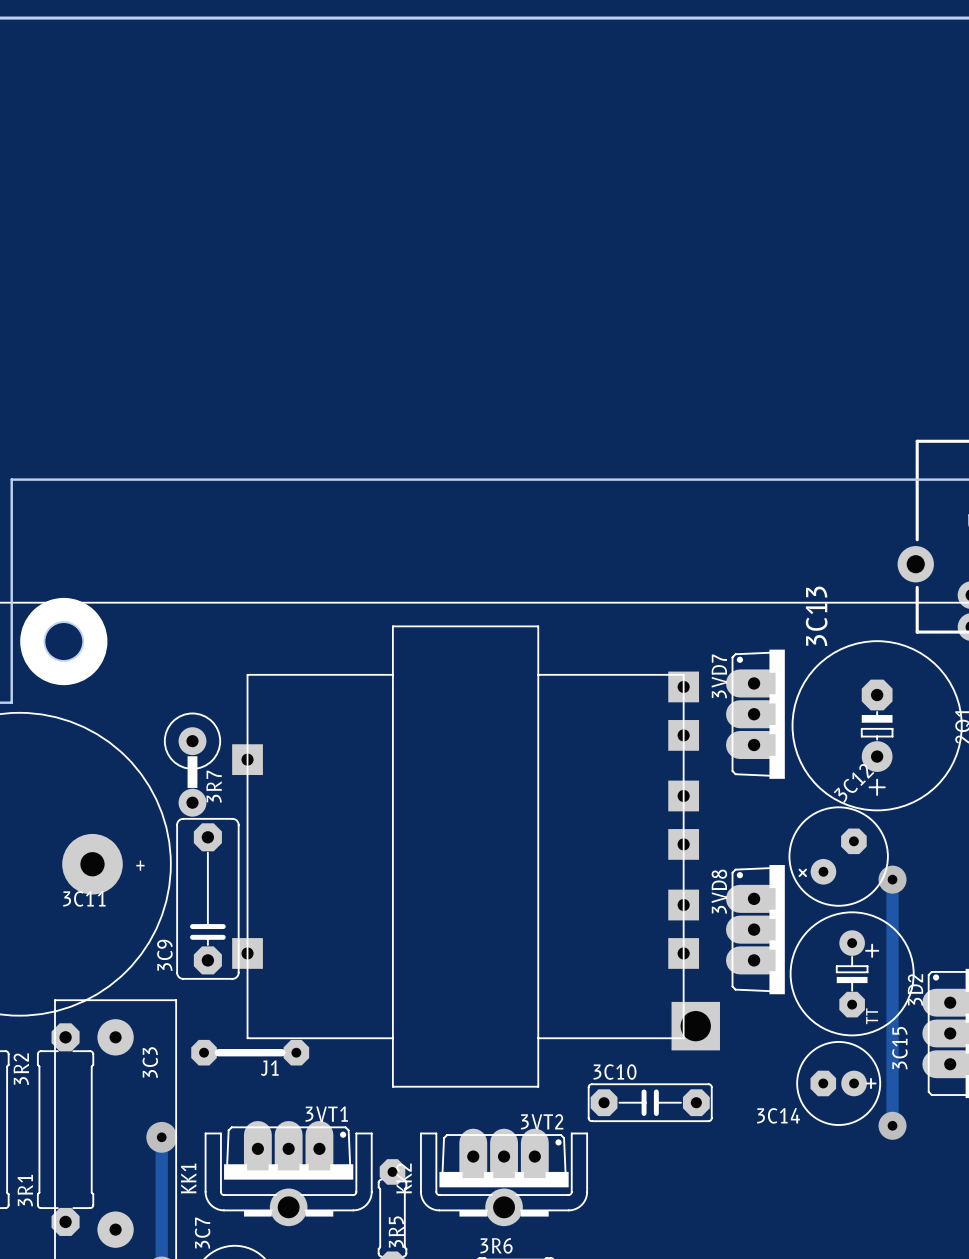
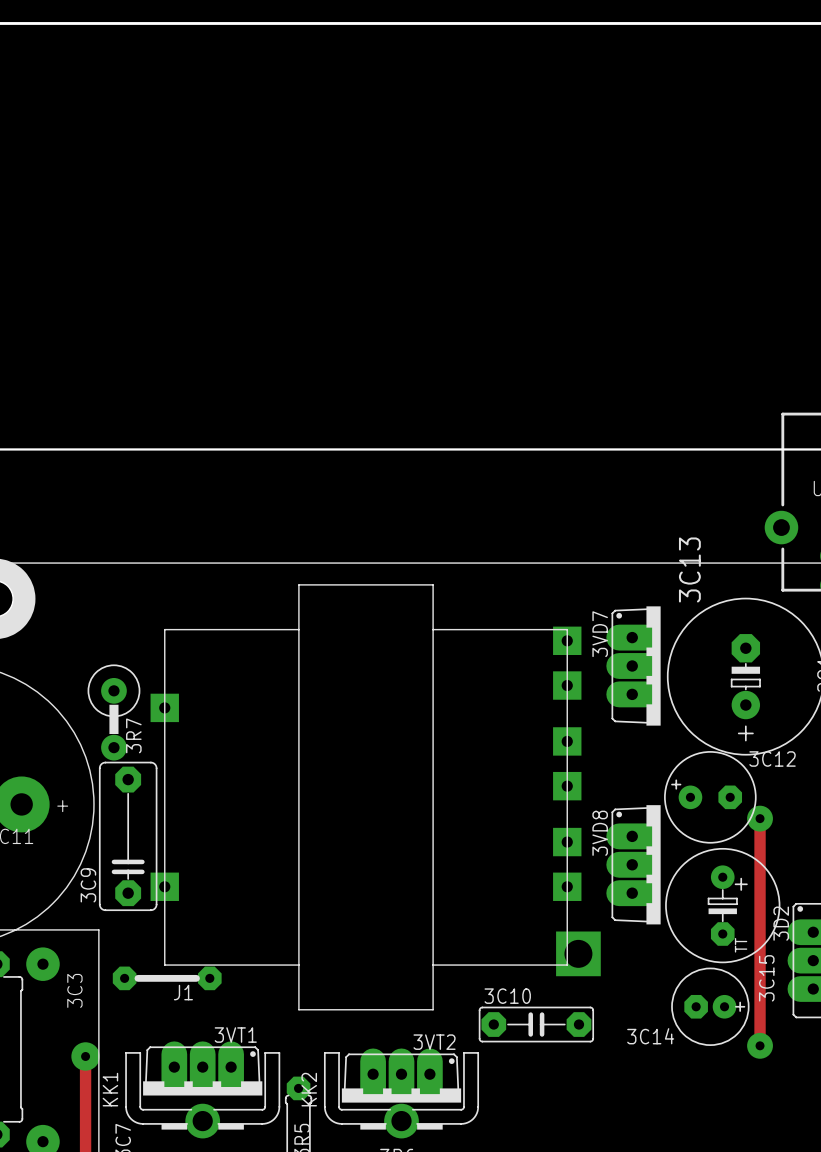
3C12 rotation: 0° (838, 856) -> 45° clockwise (710, 797)

